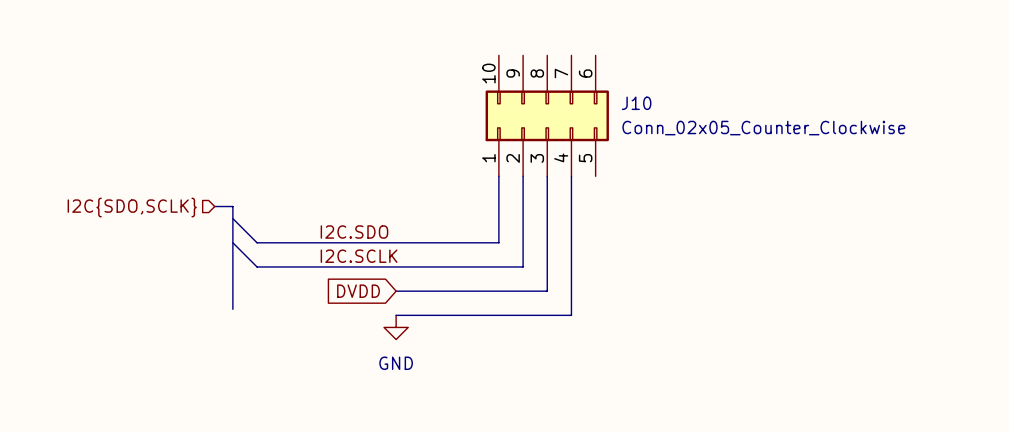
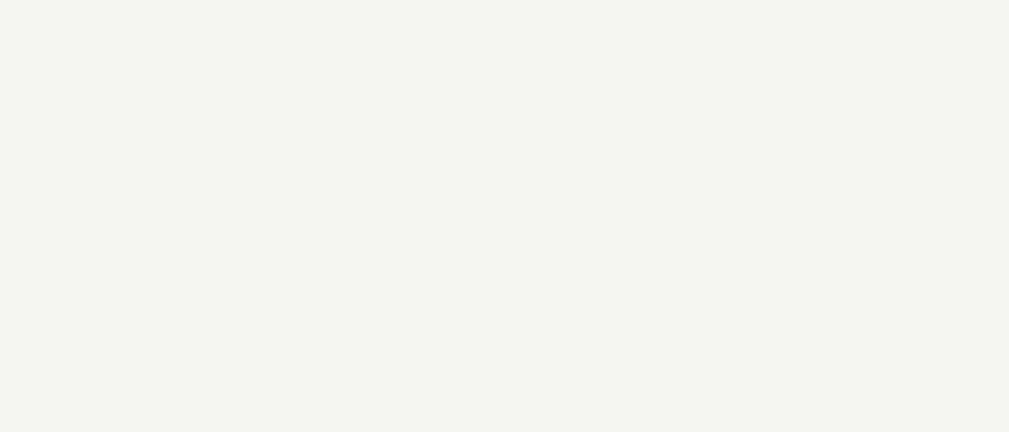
J10: Conn_02x05_Counter_Clockwise (547, 115) -> none
wire: (498, 176) (498, 242) (257, 242) (232, 218) -> none
wire: (523, 176) (523, 266) (257, 266) (232, 242) -> none
wire: (547, 176) (547, 291) (396, 291) -> none
wire: (571, 176) (571, 315) (396, 315) -> none
bus: (214, 206) (232, 206) (232, 309) -> none
hierarchical label: I2C{SDO,SCLK} (132, 207) -> none
label: I2C.SDO (354, 232) -> none
label: I2C.SCLK (359, 256) -> none
global label: DVDD (358, 291) -> none
power symbol: GND (396, 327) -> none

